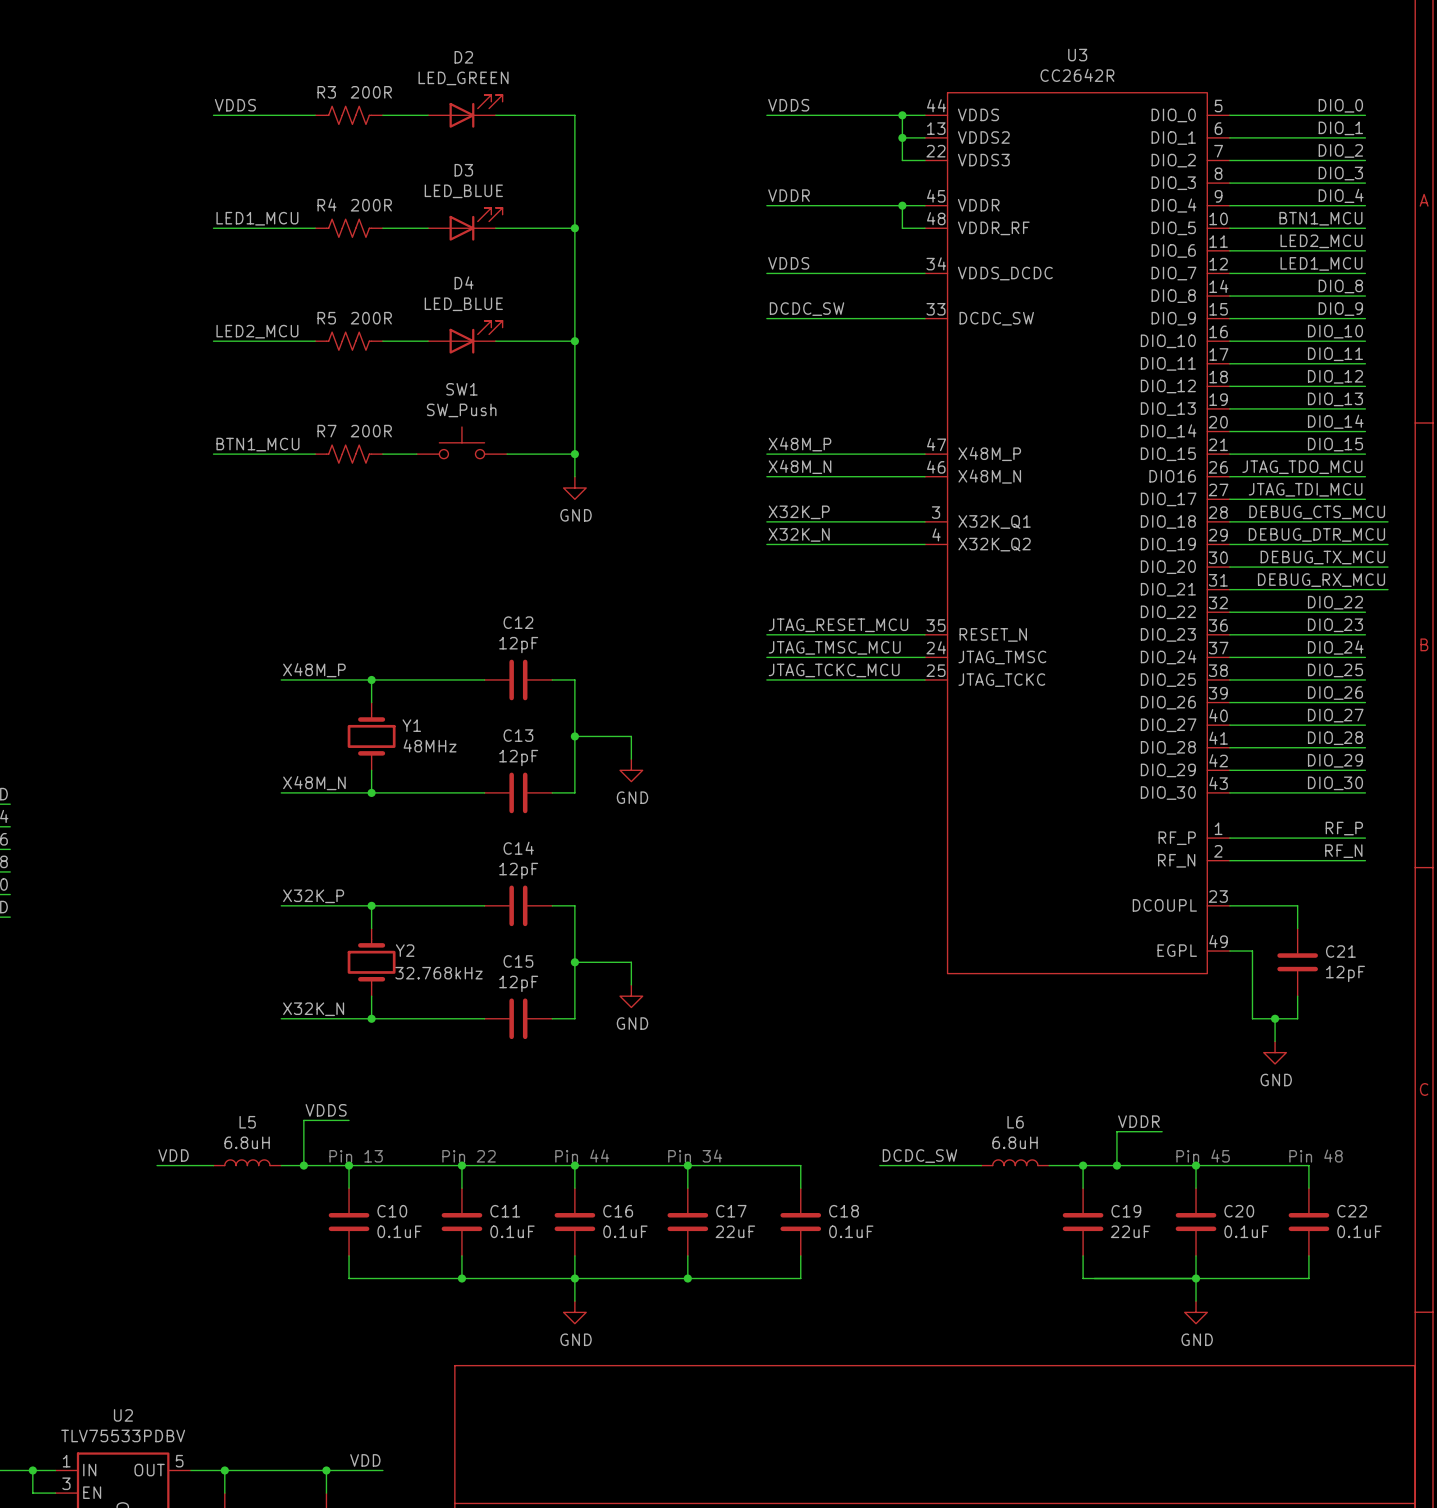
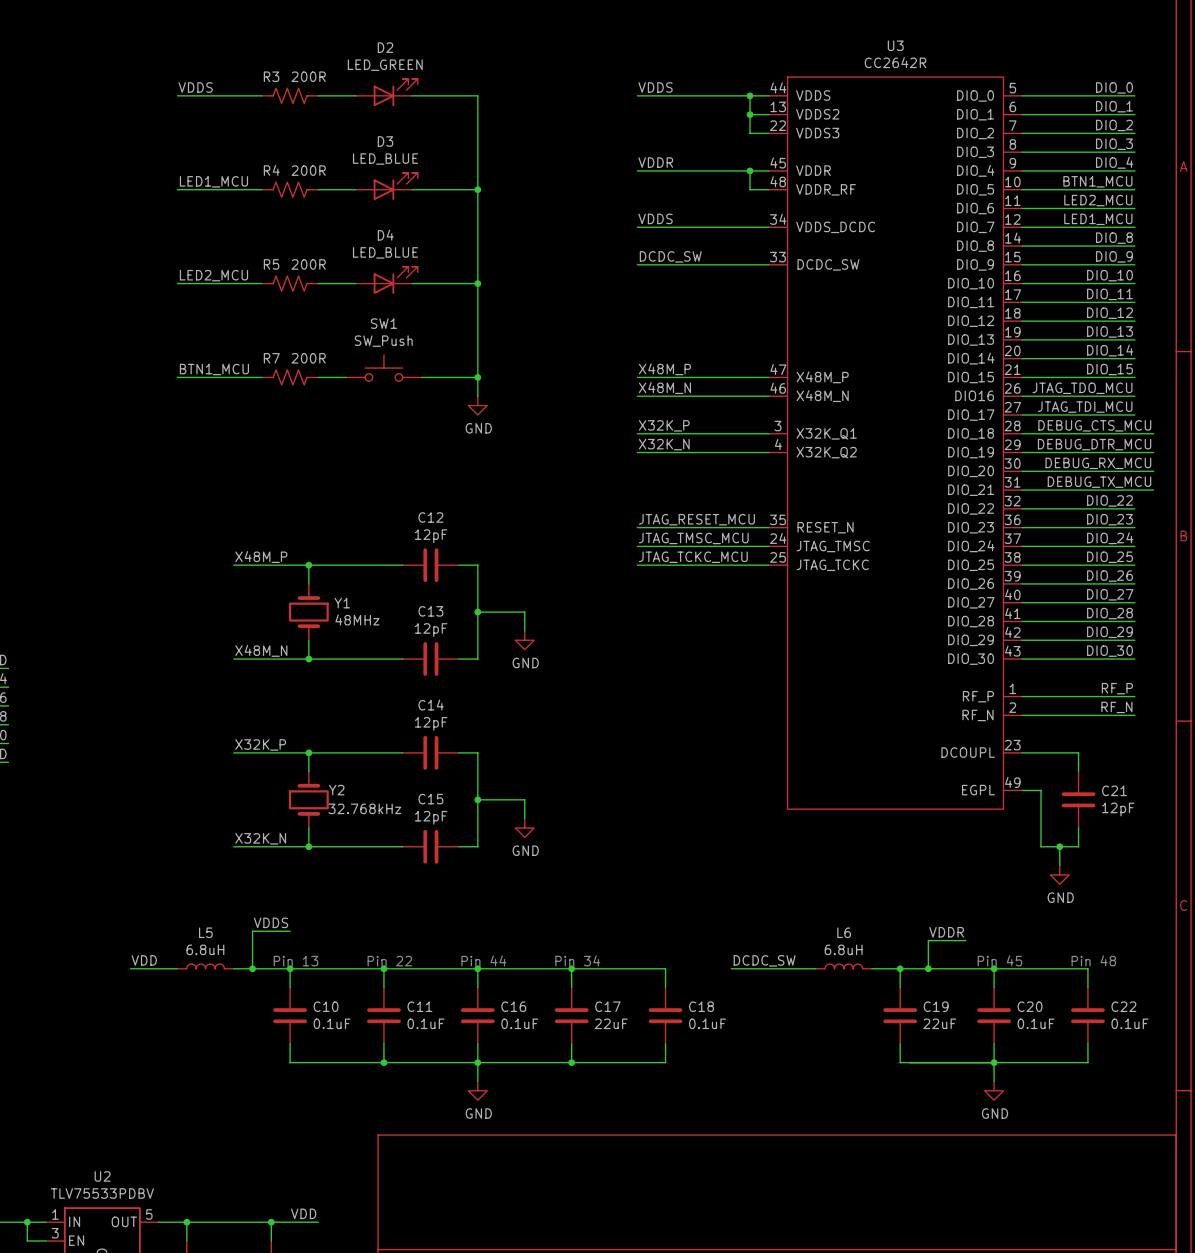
label: DEBUG_TX_MCU (1322, 557) -> DEBUG_RX_MCU (1098, 463)
label: DEBUG_RX_MCU (1321, 580) -> DEBUG_TX_MCU (1099, 482)

